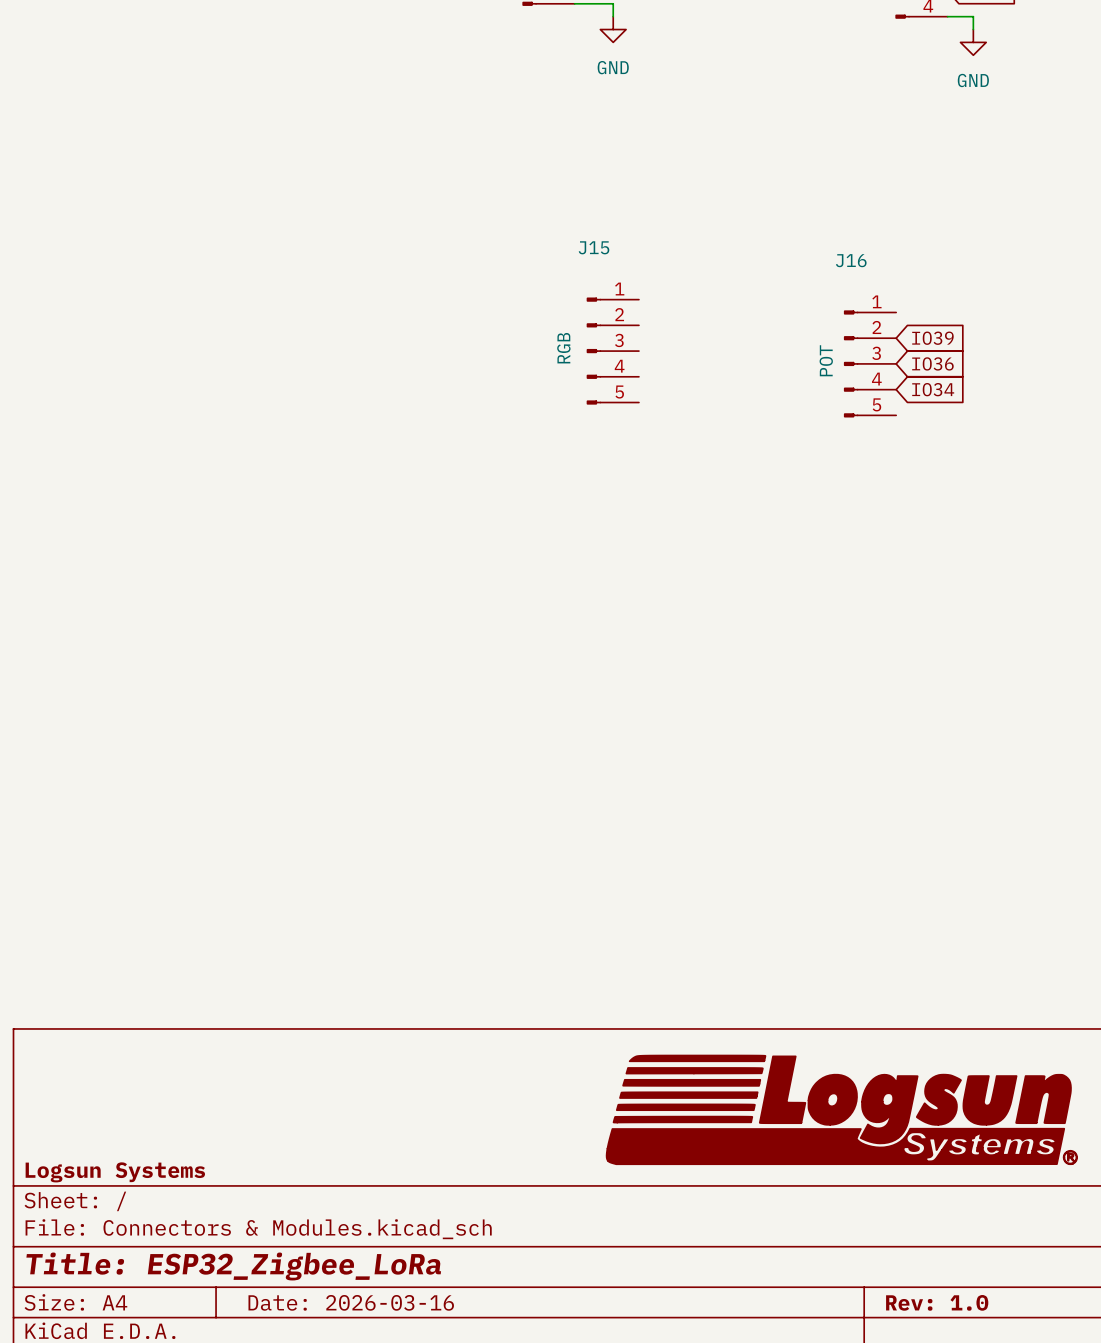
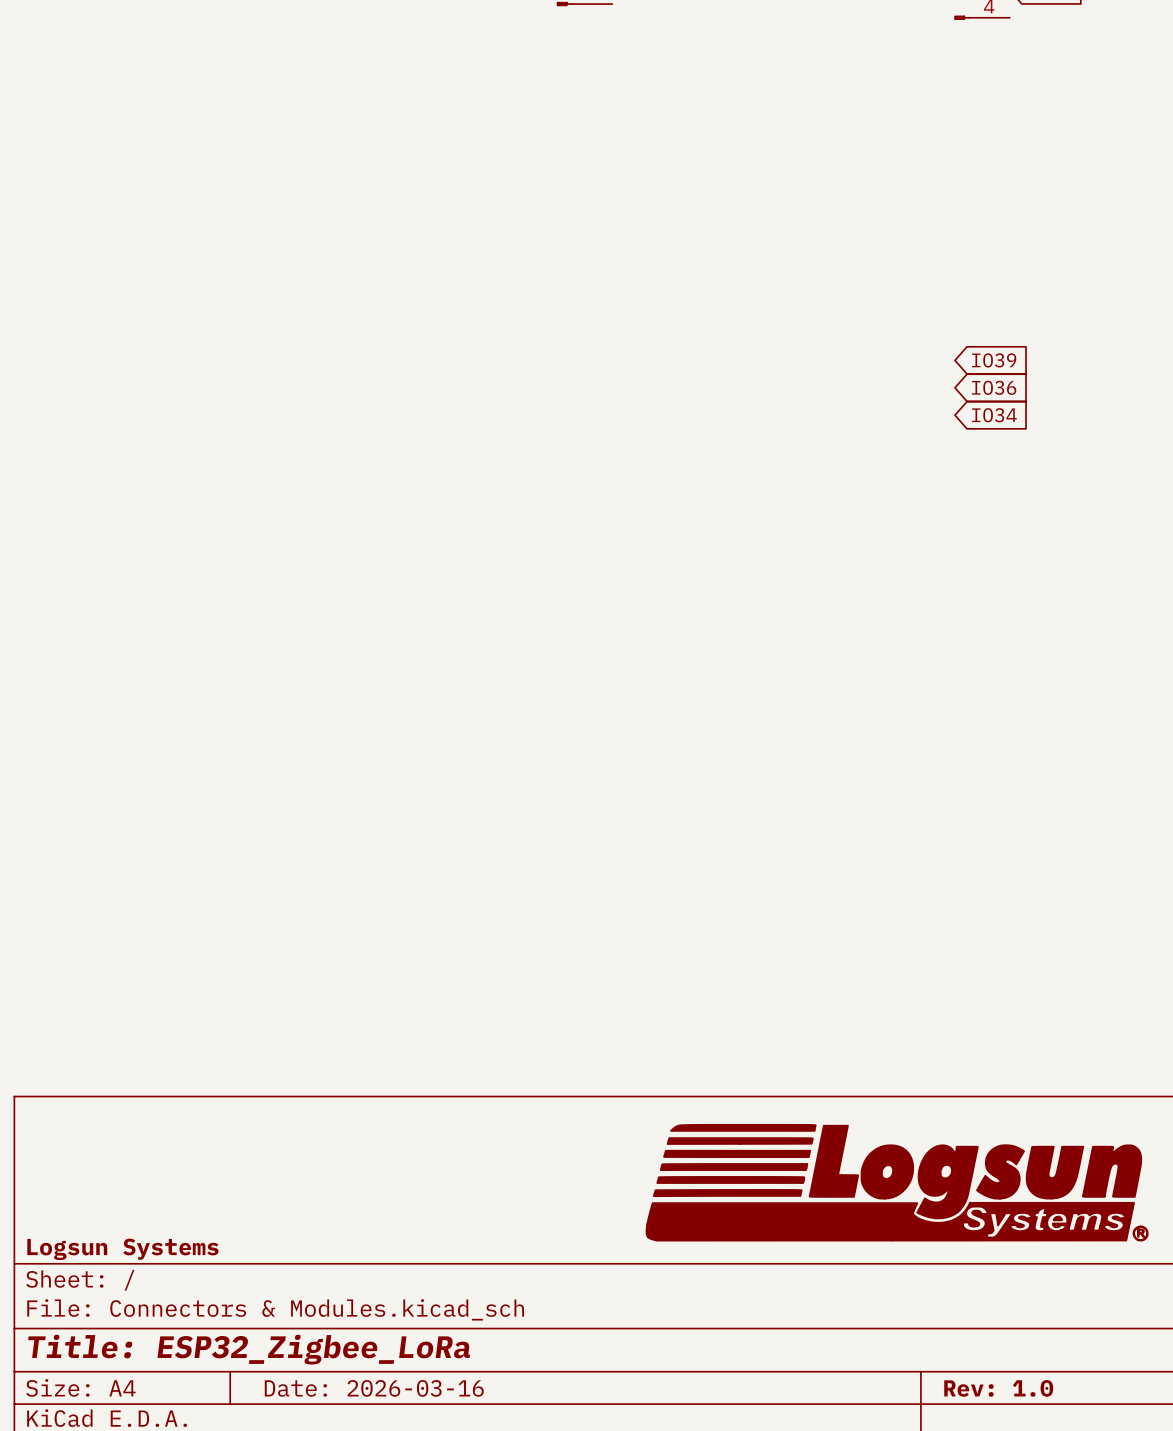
wire: (574, 3) (613, 3) (613, 16) -> none
wire: (947, 16) (973, 16) (973, 29) -> none
power symbol: GND (613, 29) -> none
power symbol: GND (973, 42) -> none
J15: RGB (612, 351) -> none
J16: POT (870, 363) -> none

